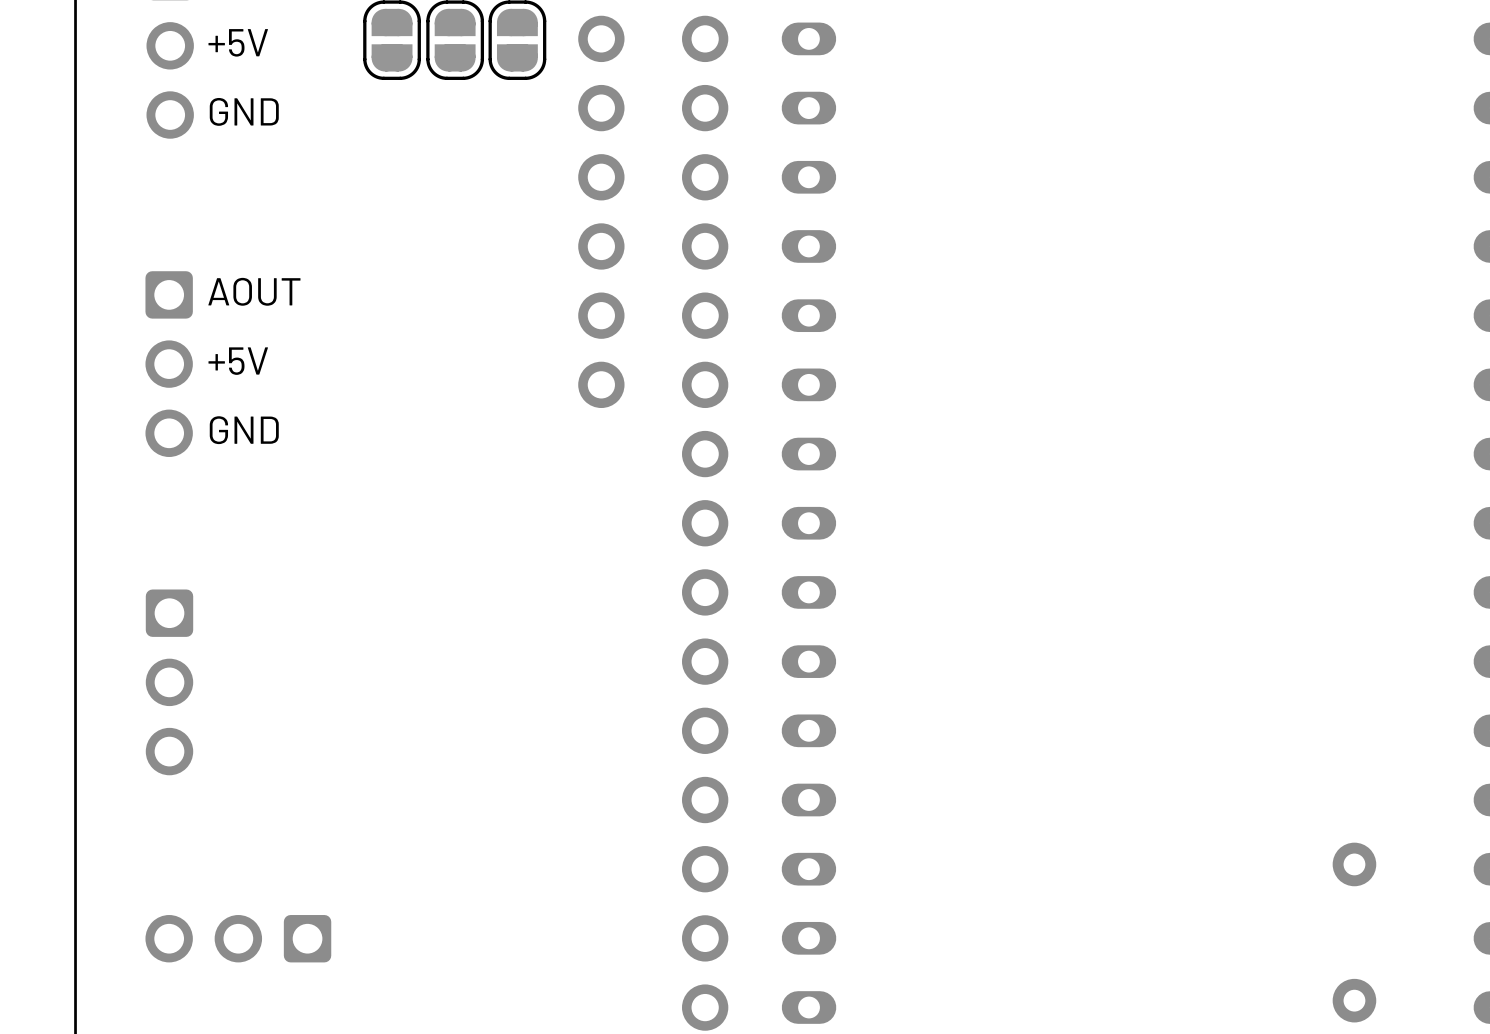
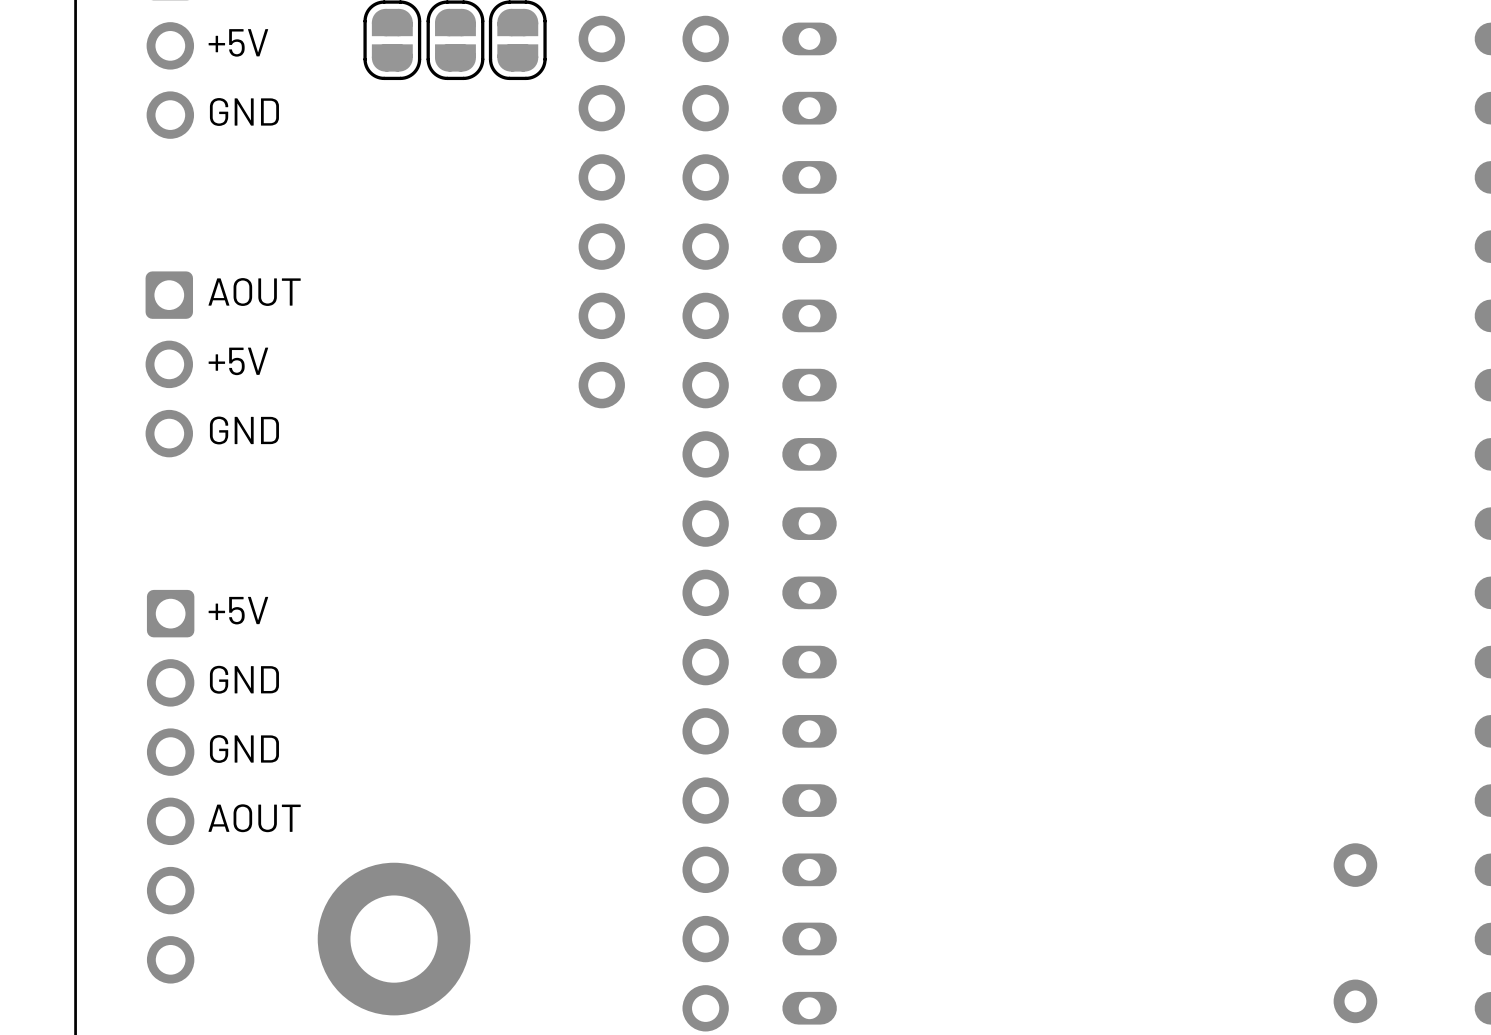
text: none -> +5V (238, 610)
text: none -> GND (244, 679)
part: (169, 682) -> none
text: none -> GND (244, 749)
part: none -> (170, 786)
text: none -> AOUT (254, 818)
part: (238, 938) -> none
part: none -> (394, 939)

